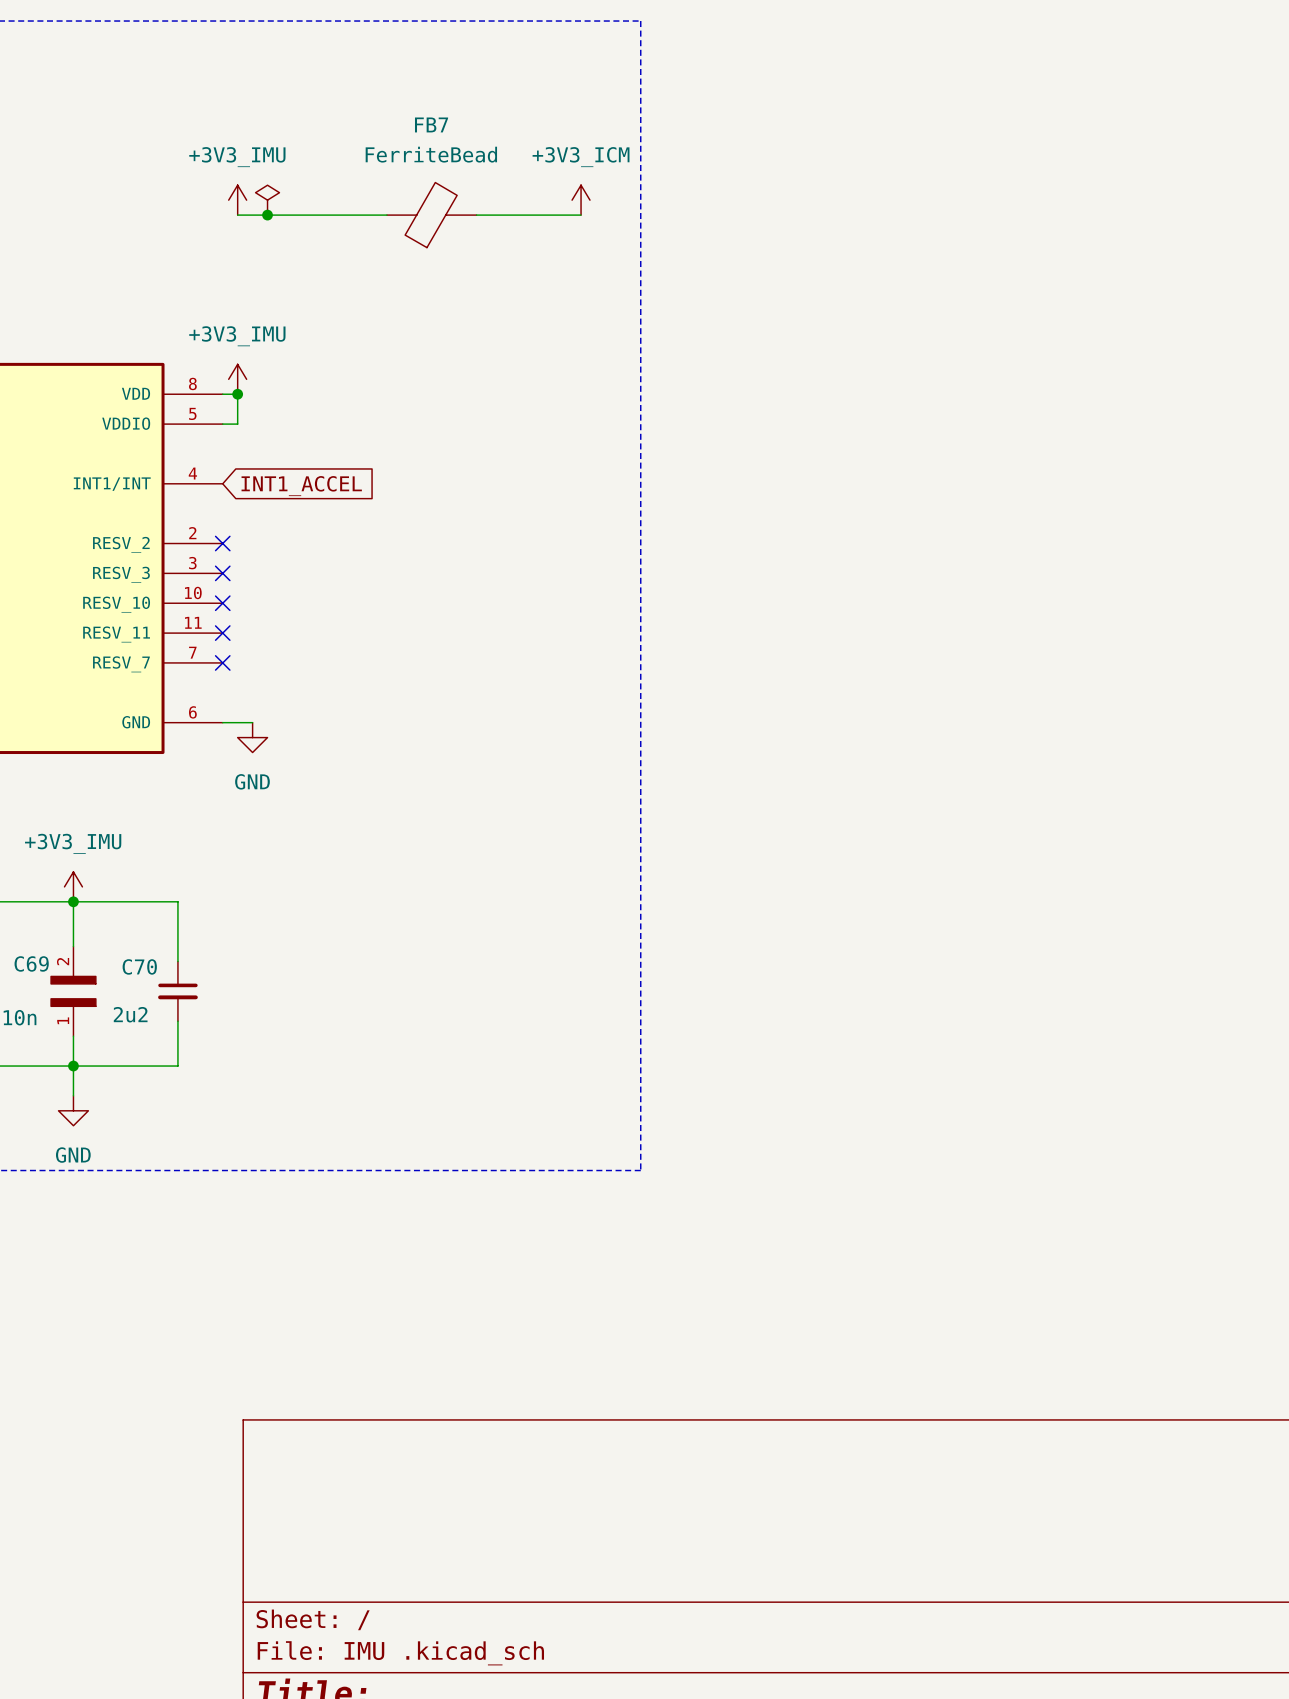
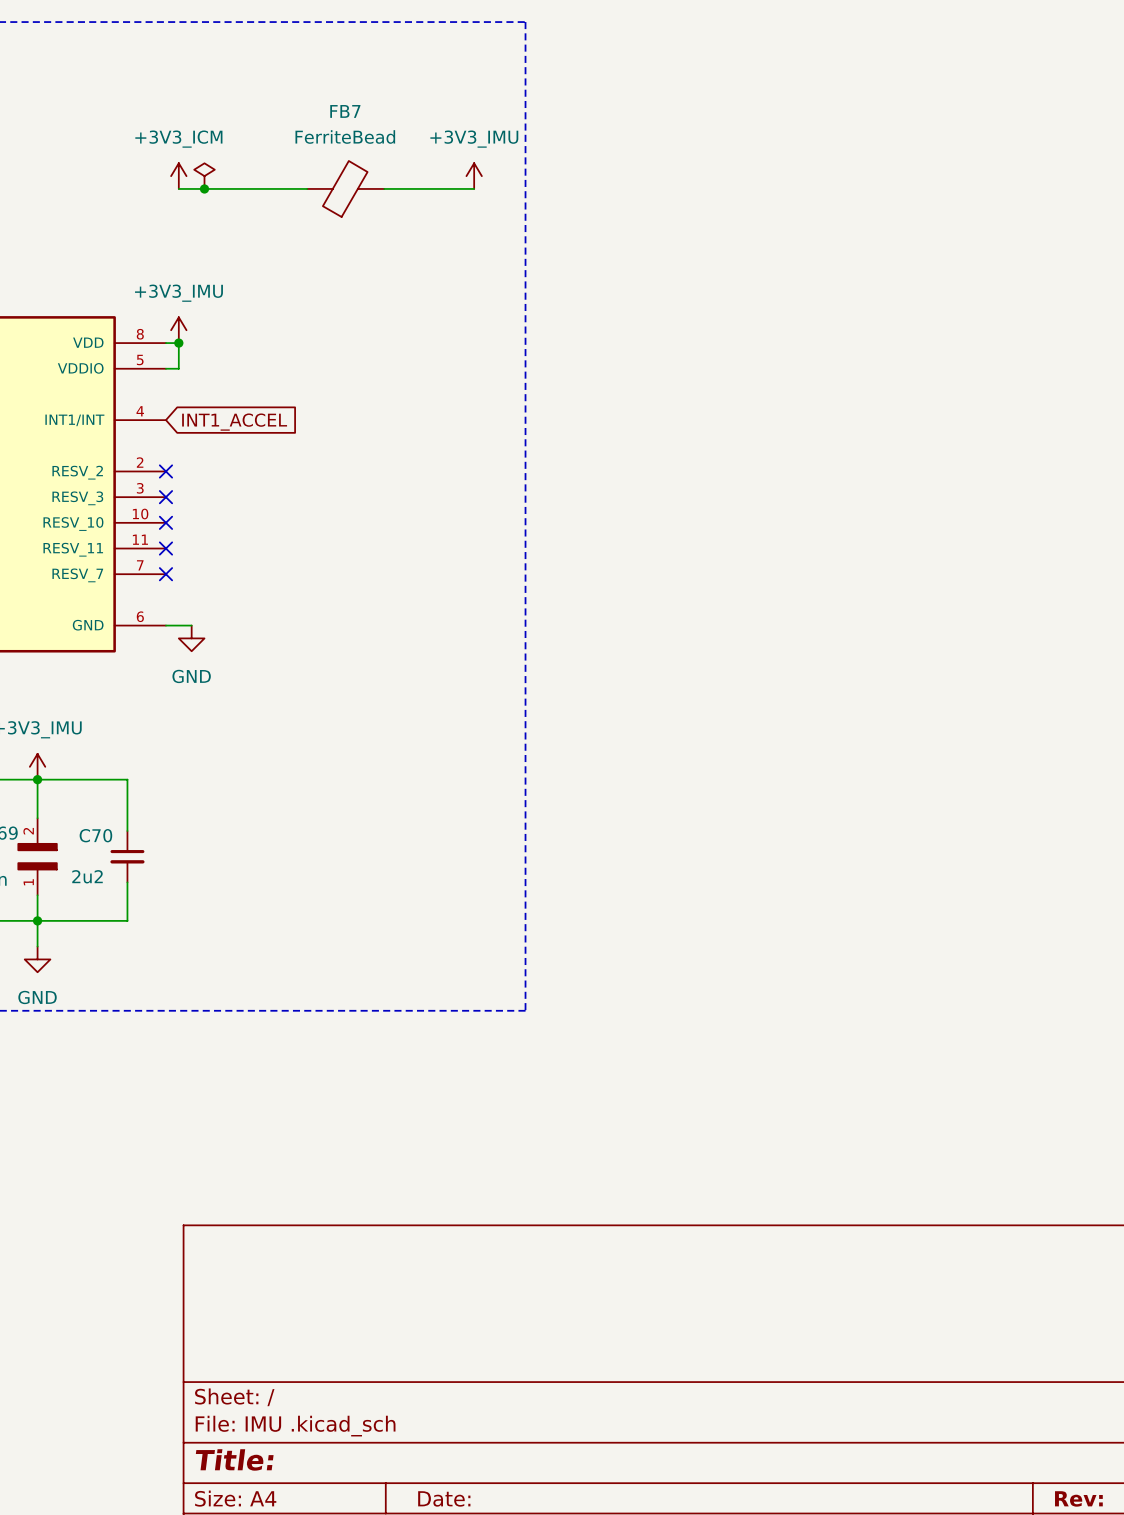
power symbol: +3V3_IMU (237, 200) -> +3V3_ICM (178, 176)
power symbol: +3V3_ICM (581, 200) -> +3V3_IMU (474, 176)

